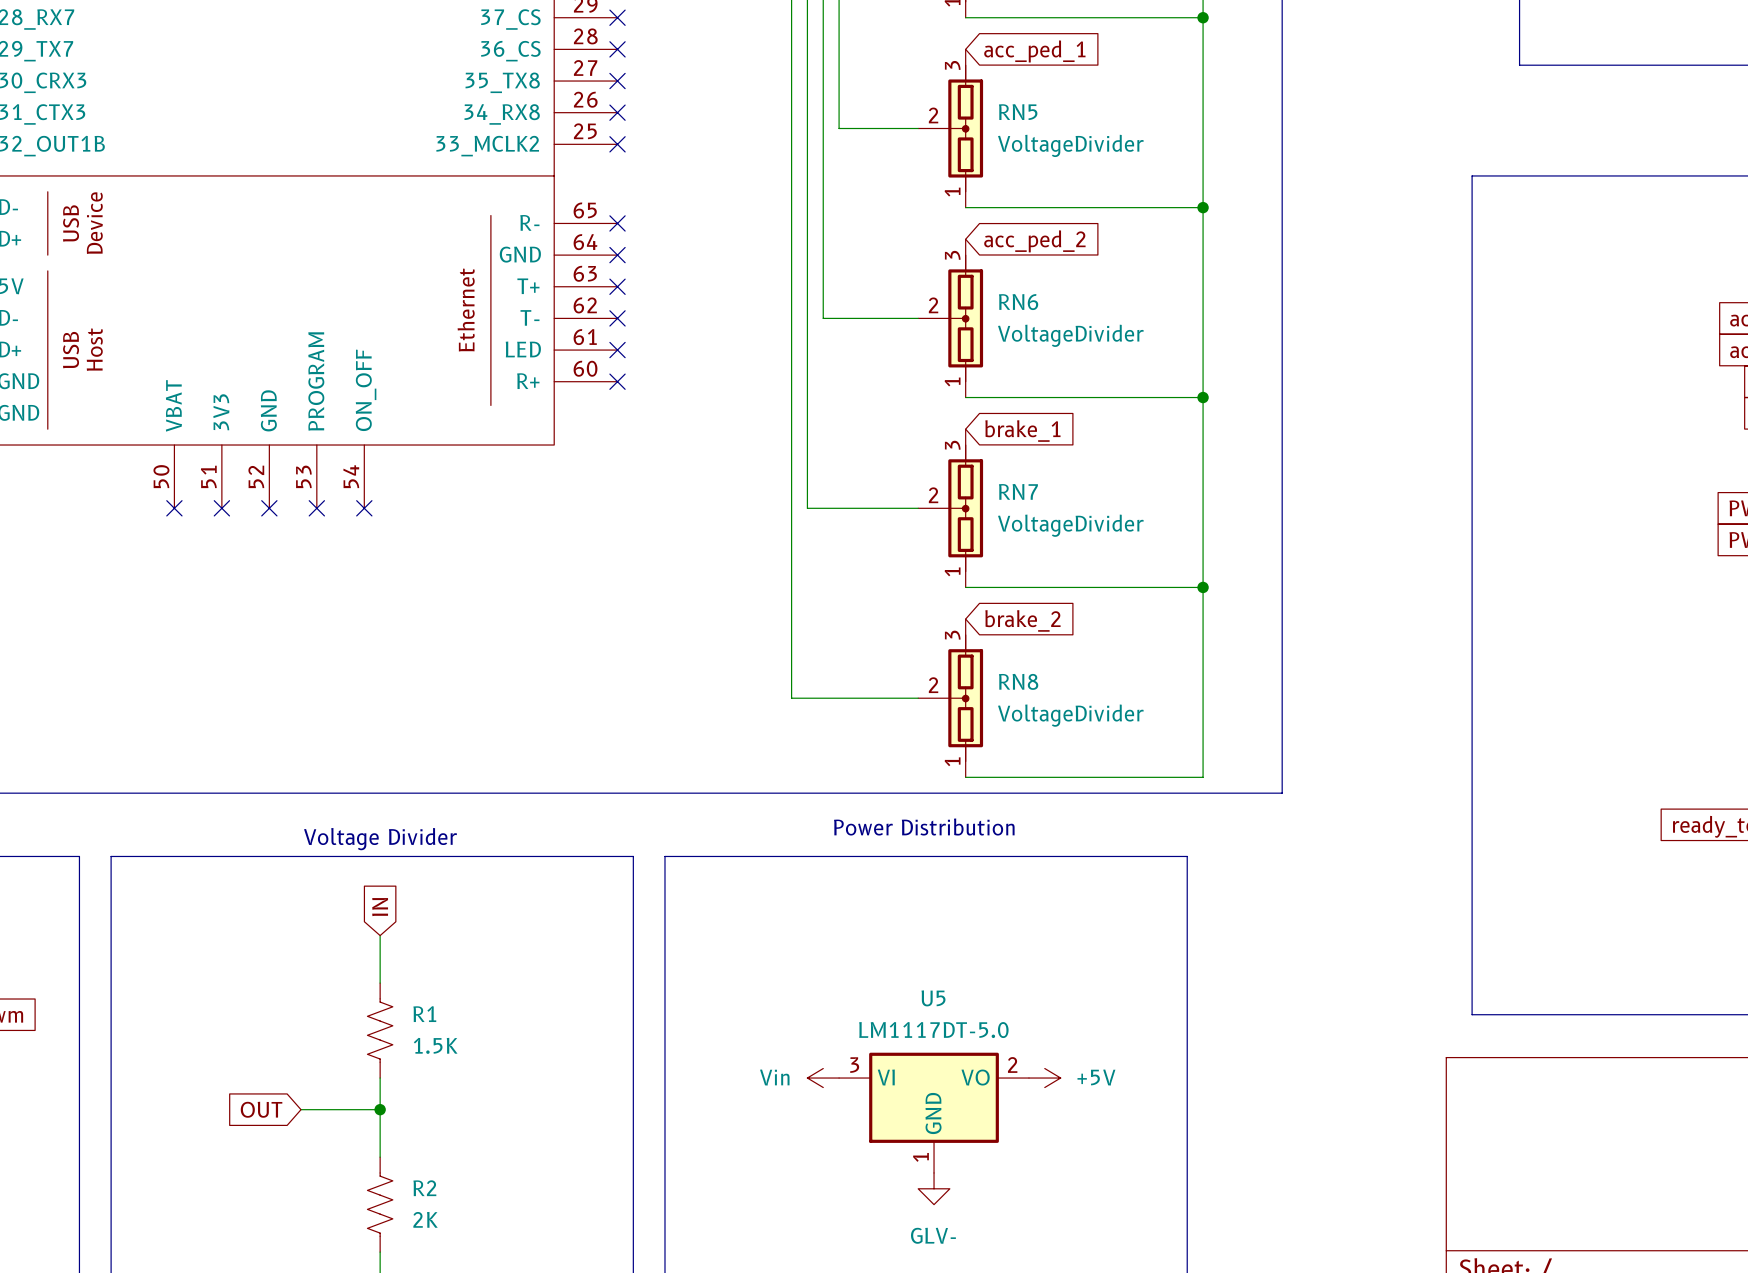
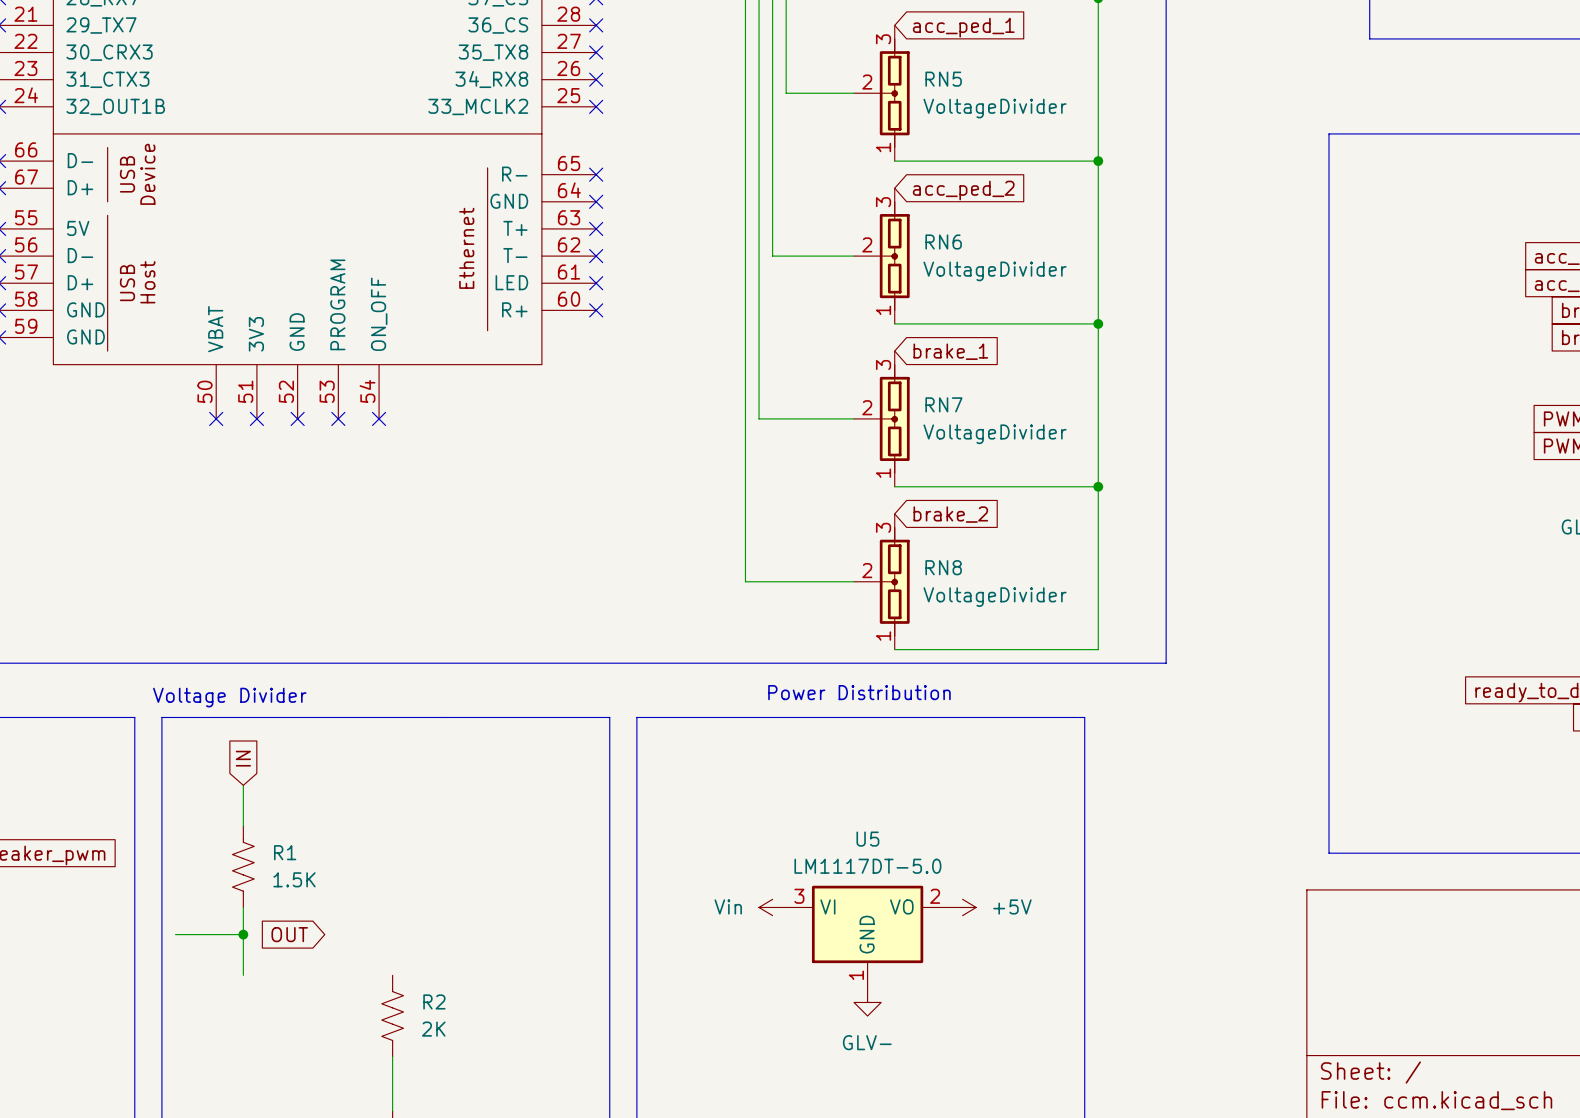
text position: Voltage Divider (380, 839) -> Voltage Divider (229, 697)
global label position: IN (380, 907) -> IN (243, 758)
wire: (380, 935) (380, 983) -> (243, 785) (243, 826)
R1 position: (380, 1030) -> (243, 866)
wire: (380, 1078) (380, 1157) -> (243, 907) (243, 975)
junction: none -> (243, 934)
wire: (301, 1109) (380, 1109) -> (175, 934) (243, 934)
junction: (380, 1109) -> none

